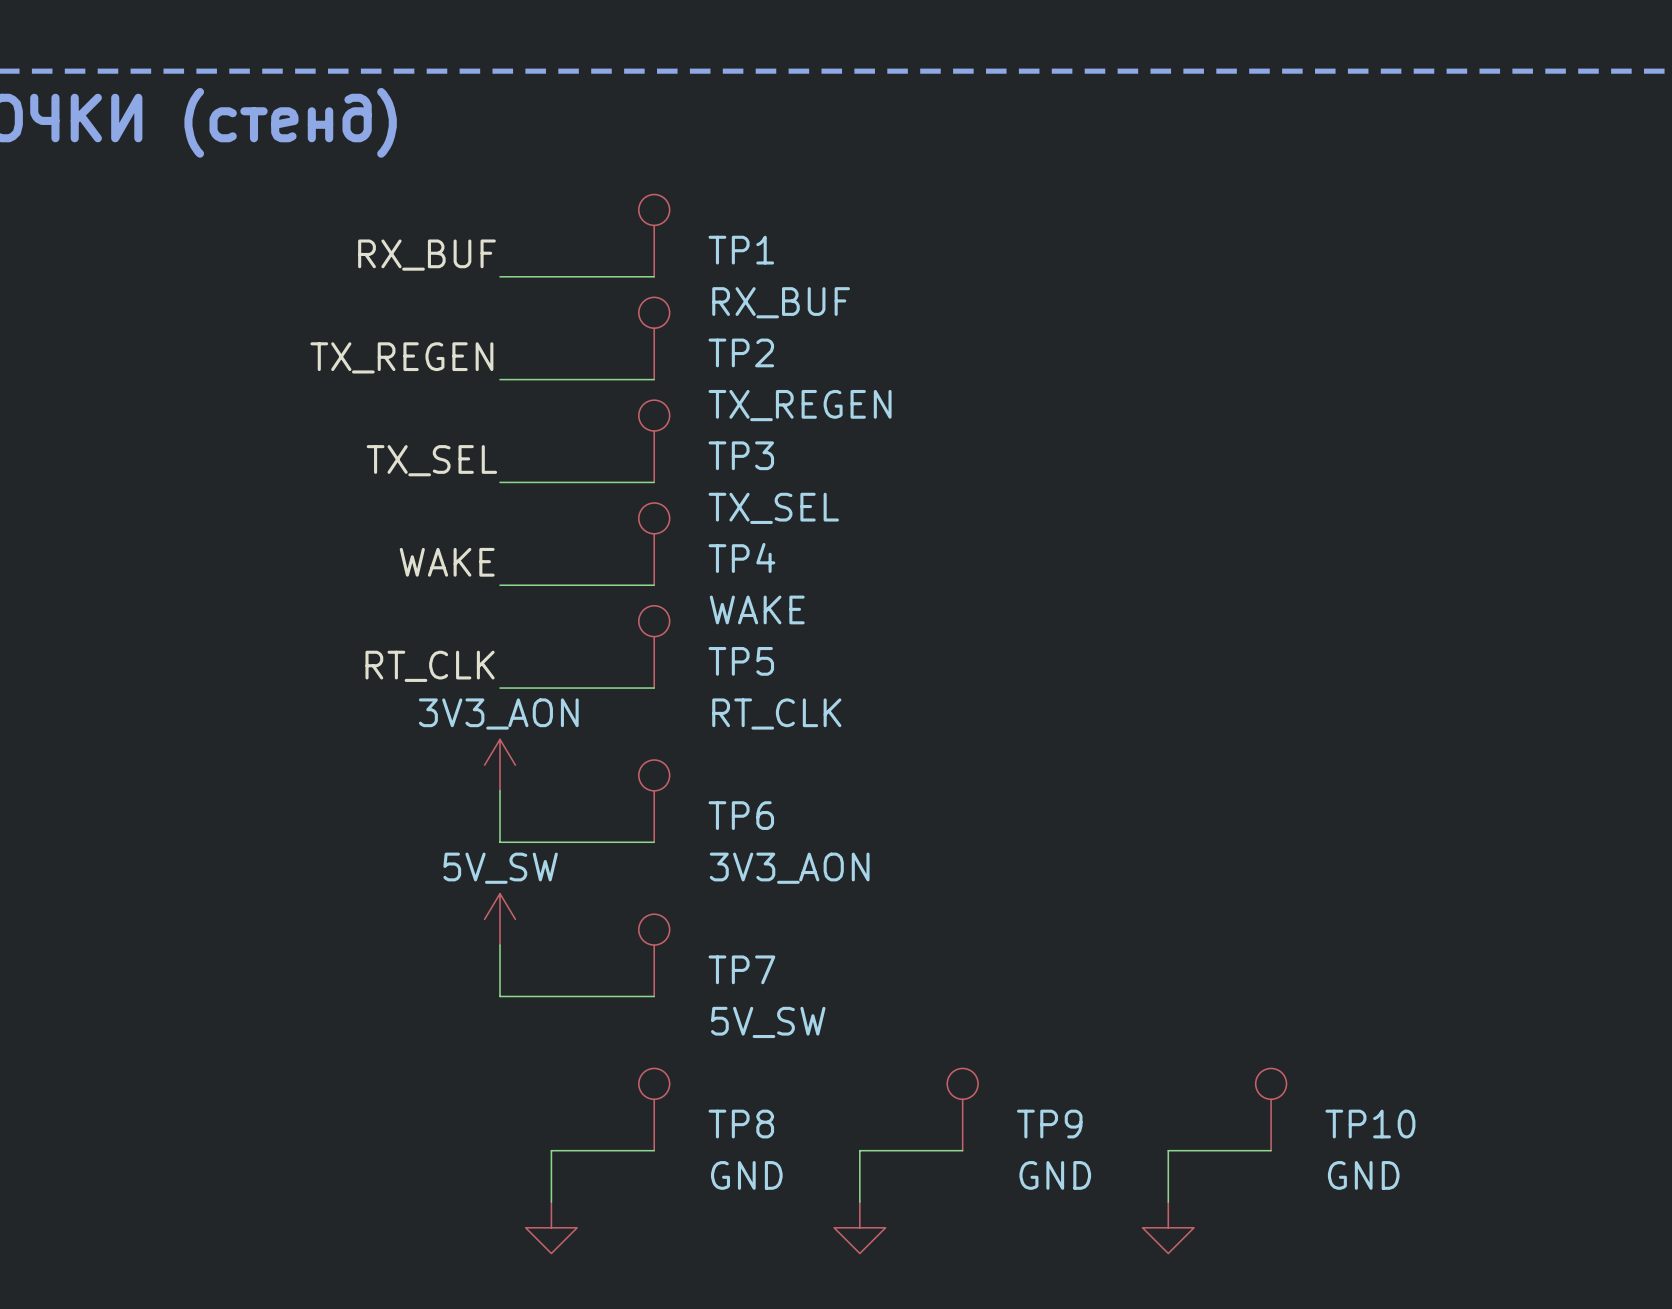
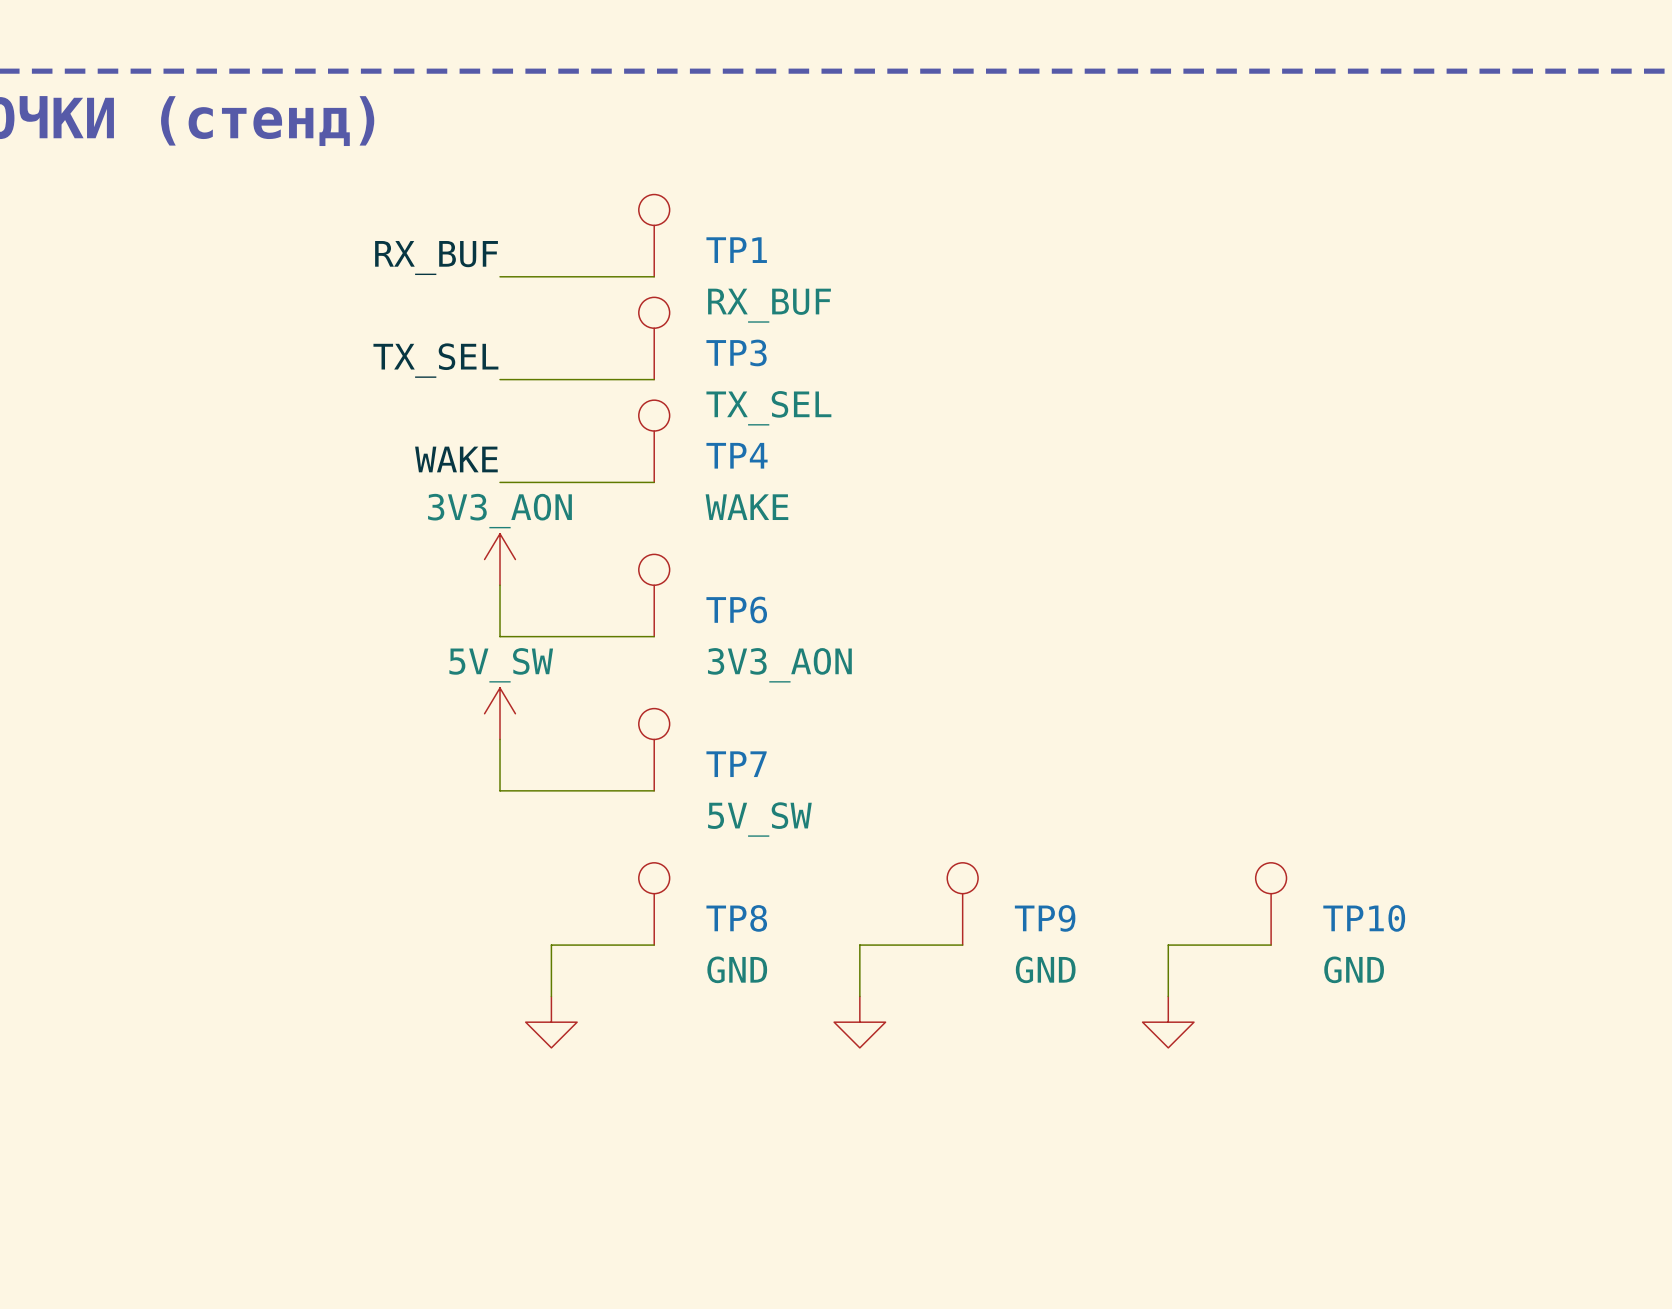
TP2 name: TP2 (741, 352) -> TP3 (736, 352)
label: TX_REGEN (401, 357) -> TX_SEL (435, 360)
TP2 value: TX_REGEN (800, 405) -> TX_SEL (768, 408)
TP3 name: TP3 (741, 455) -> TP4 (737, 455)
label: TX_SEL (431, 460) -> WAKE (456, 459)
TP3 value: TX_SEL (773, 508) -> WAKE (746, 507)
TP4: WAKE (654, 544) -> none
label: WAKE (447, 562) -> none
wire: (500, 585) (654, 585) -> (500, 585) (500, 636) (654, 636)
TP5: RT_CLK (654, 646) -> none
label: RT_CLK (430, 666) -> none
wire: (500, 688) (654, 688) -> none
power symbol position: 3V3_AON (500, 765) -> 3V3_AON (500, 559)
wire: (500, 790) (500, 842) (654, 842) -> none
TP6 position: (654, 801) -> (654, 595)
power symbol position: 5V_SW (500, 919) -> 5V_SW (500, 713)
wire: (500, 945) (500, 996) (654, 996) -> (500, 739) (500, 790) (654, 790)
TP7 position: (654, 955) -> (654, 749)
power symbol: none -> (551, 1022)
power symbol: none -> (859, 1022)
power symbol: none -> (1168, 1022)
TP8 position: (654, 1109) -> (654, 903)
TP9 position: (962, 1109) -> (962, 903)
TP10 position: (1271, 1109) -> (1271, 903)
wire: (654, 1150) (551, 1150) (551, 1202) -> (654, 945) (551, 945) (551, 996)
wire: (962, 1150) (859, 1150) (859, 1202) -> (962, 945) (859, 945) (859, 996)
wire: (1271, 1150) (1168, 1150) (1168, 1202) -> (1271, 945) (1168, 945) (1168, 996)
power symbol: (551, 1227) -> none
power symbol: (859, 1227) -> none
power symbol: (1168, 1227) -> none

